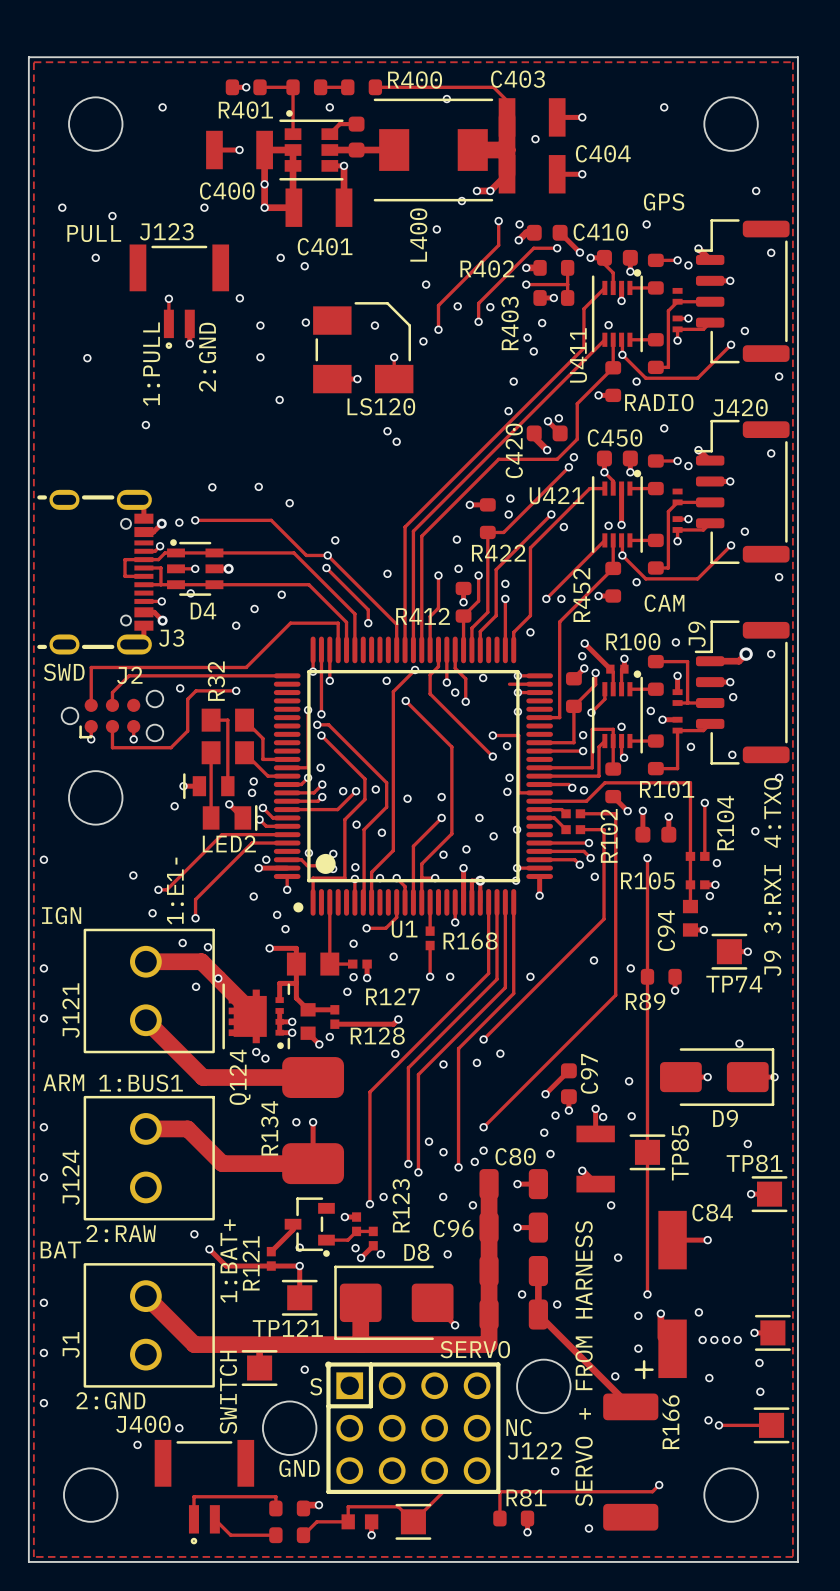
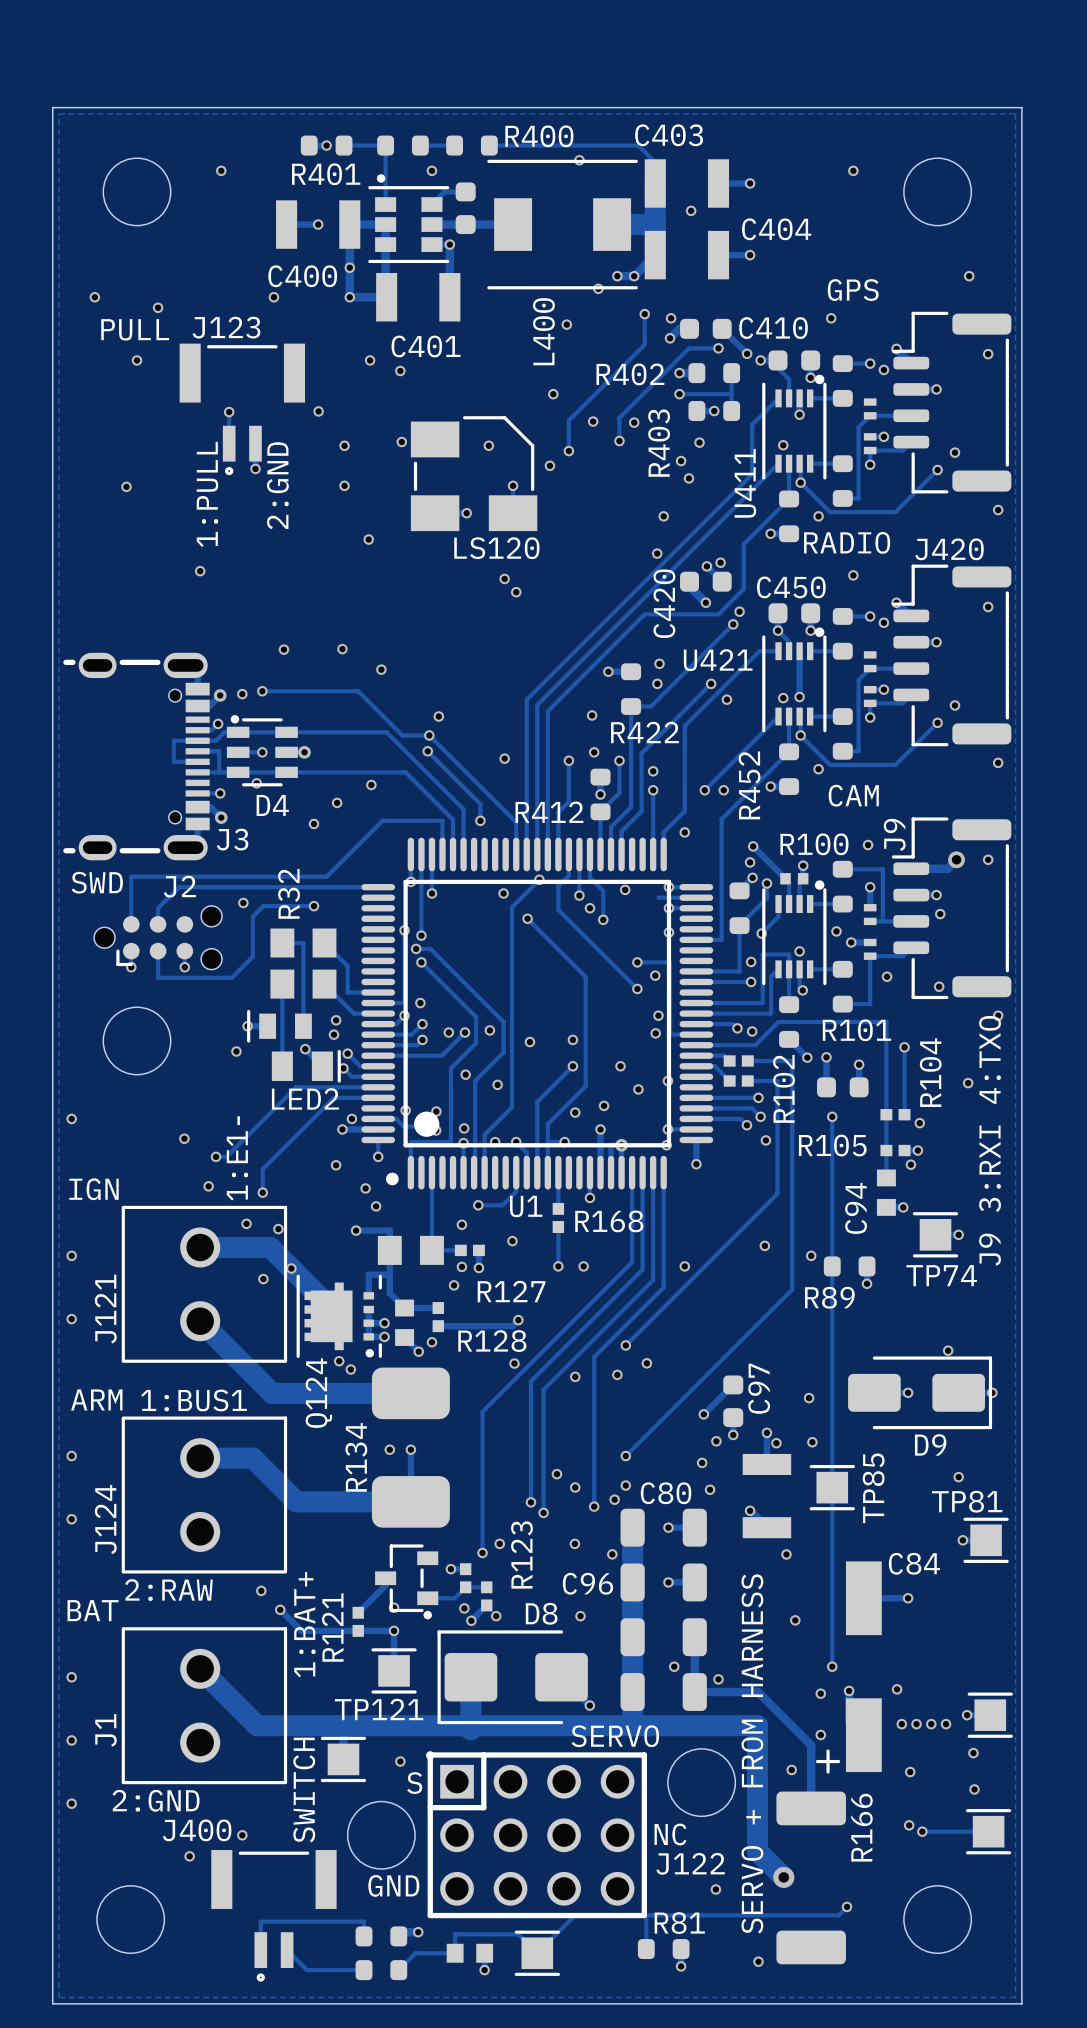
track: (538, 1314) (630, 1406) -> (694, 1692) (758, 1692) (811, 1745) (811, 1808)
track: (191, 1341) (194, 1344) (489, 1344) (489, 1341) -> (257, 1725) (757, 1725) (757, 1851) (783, 1877)
via: none -> (783, 1877)

